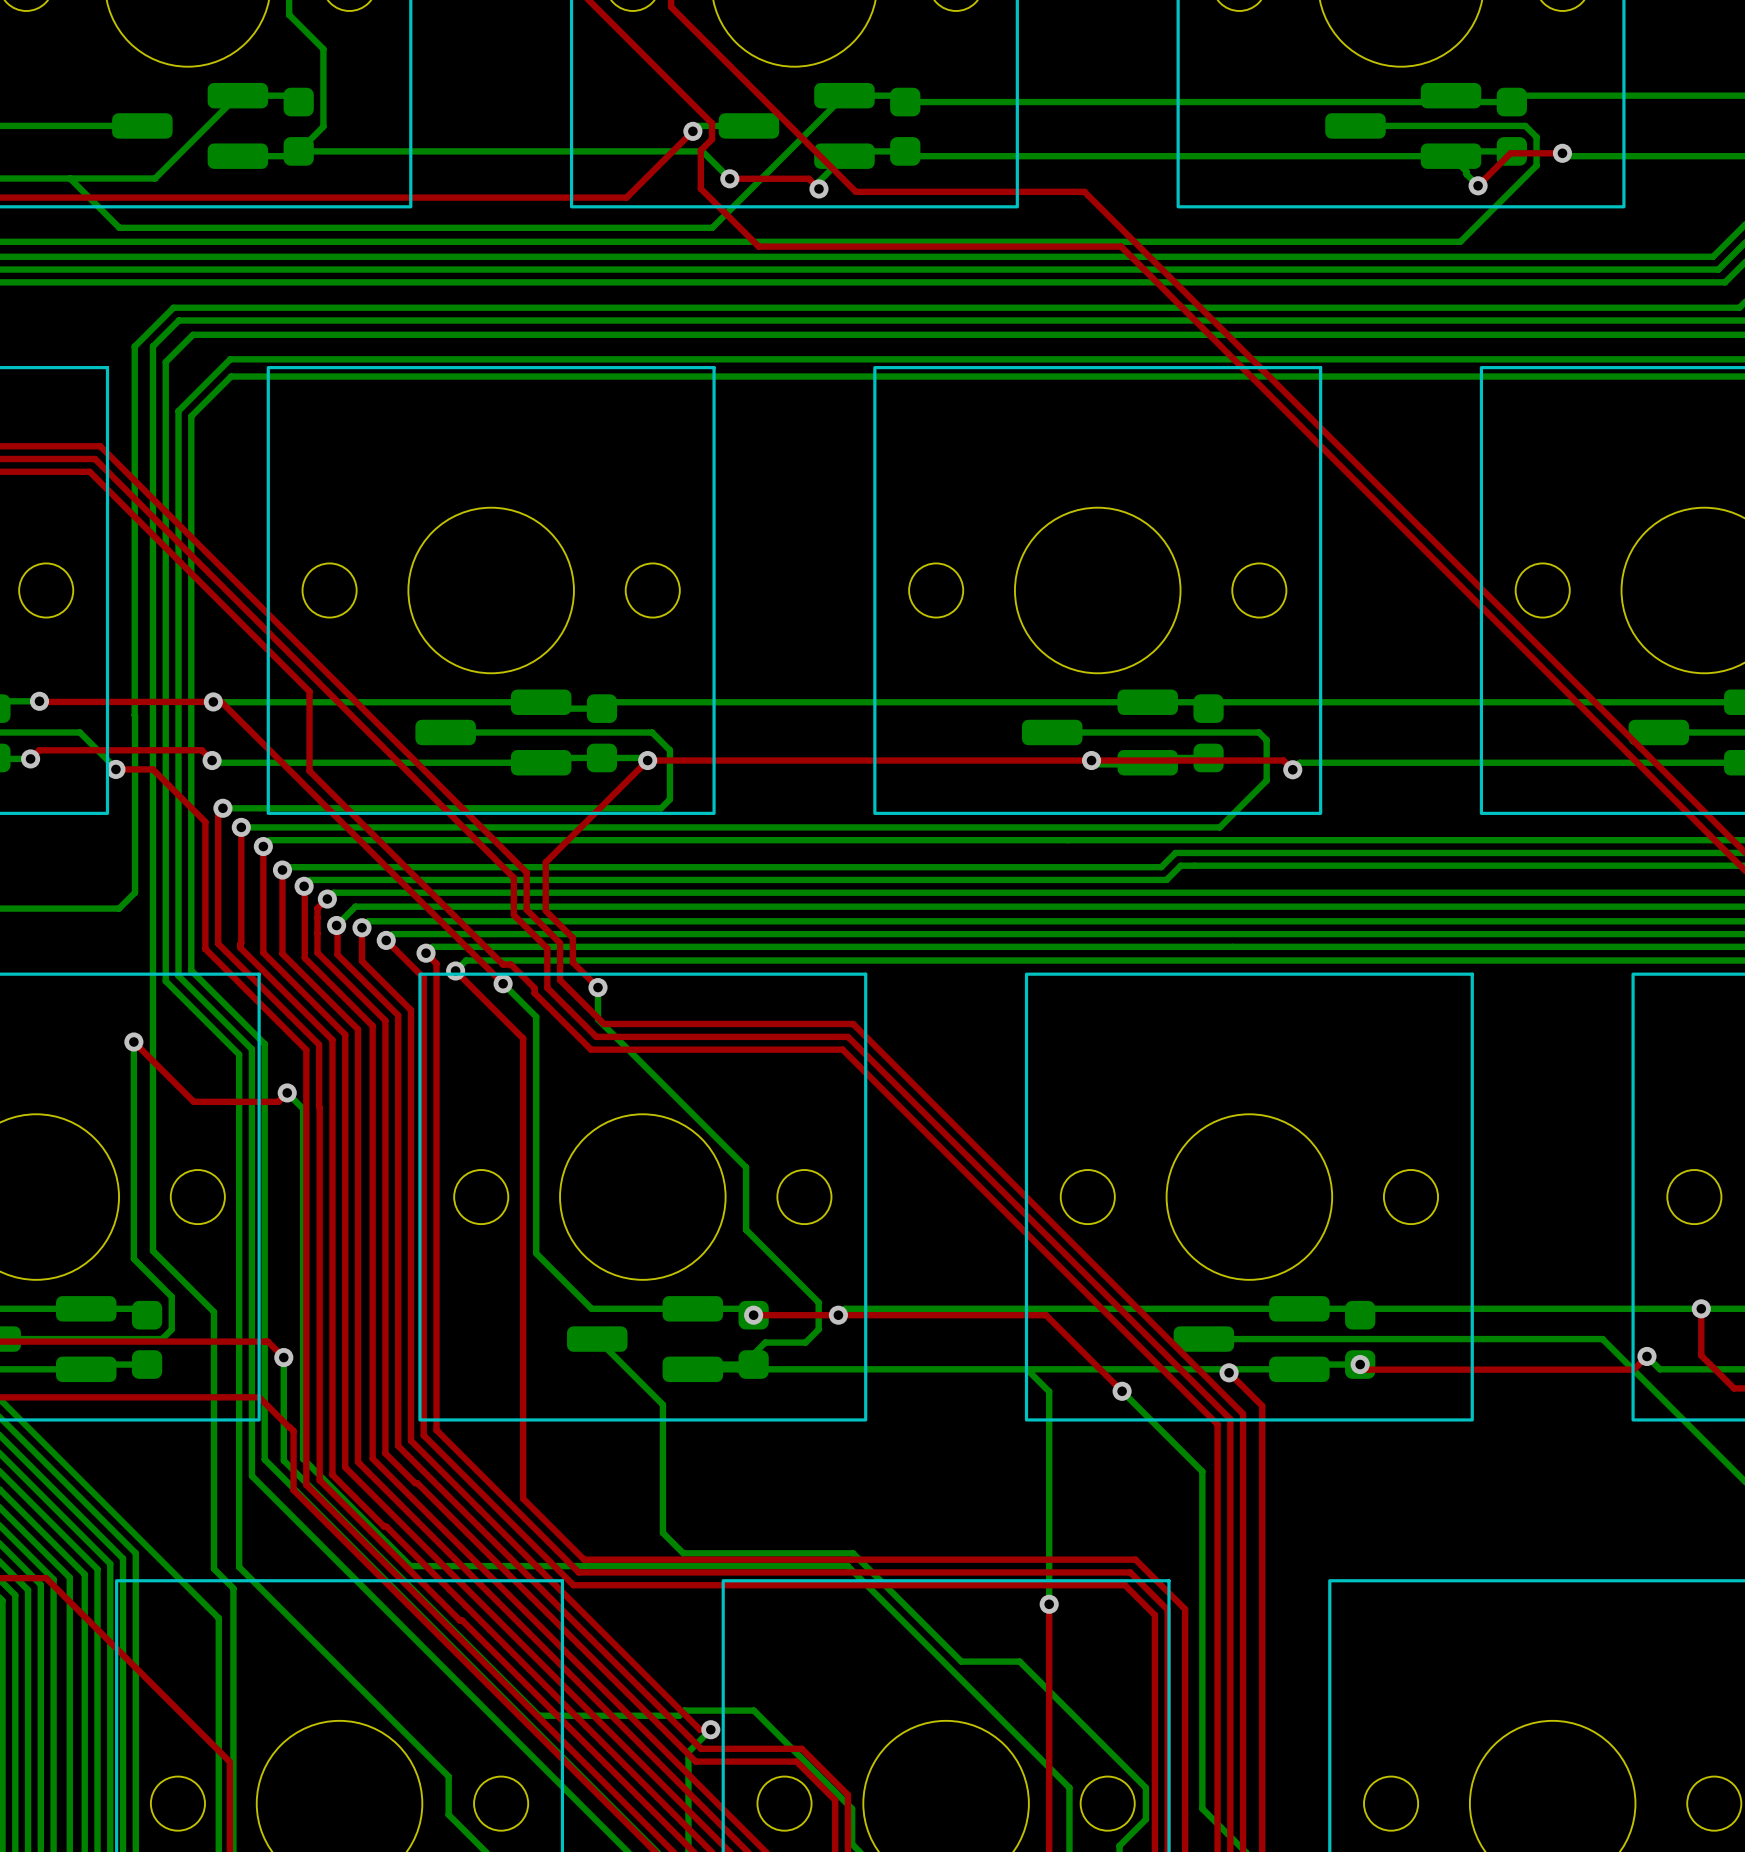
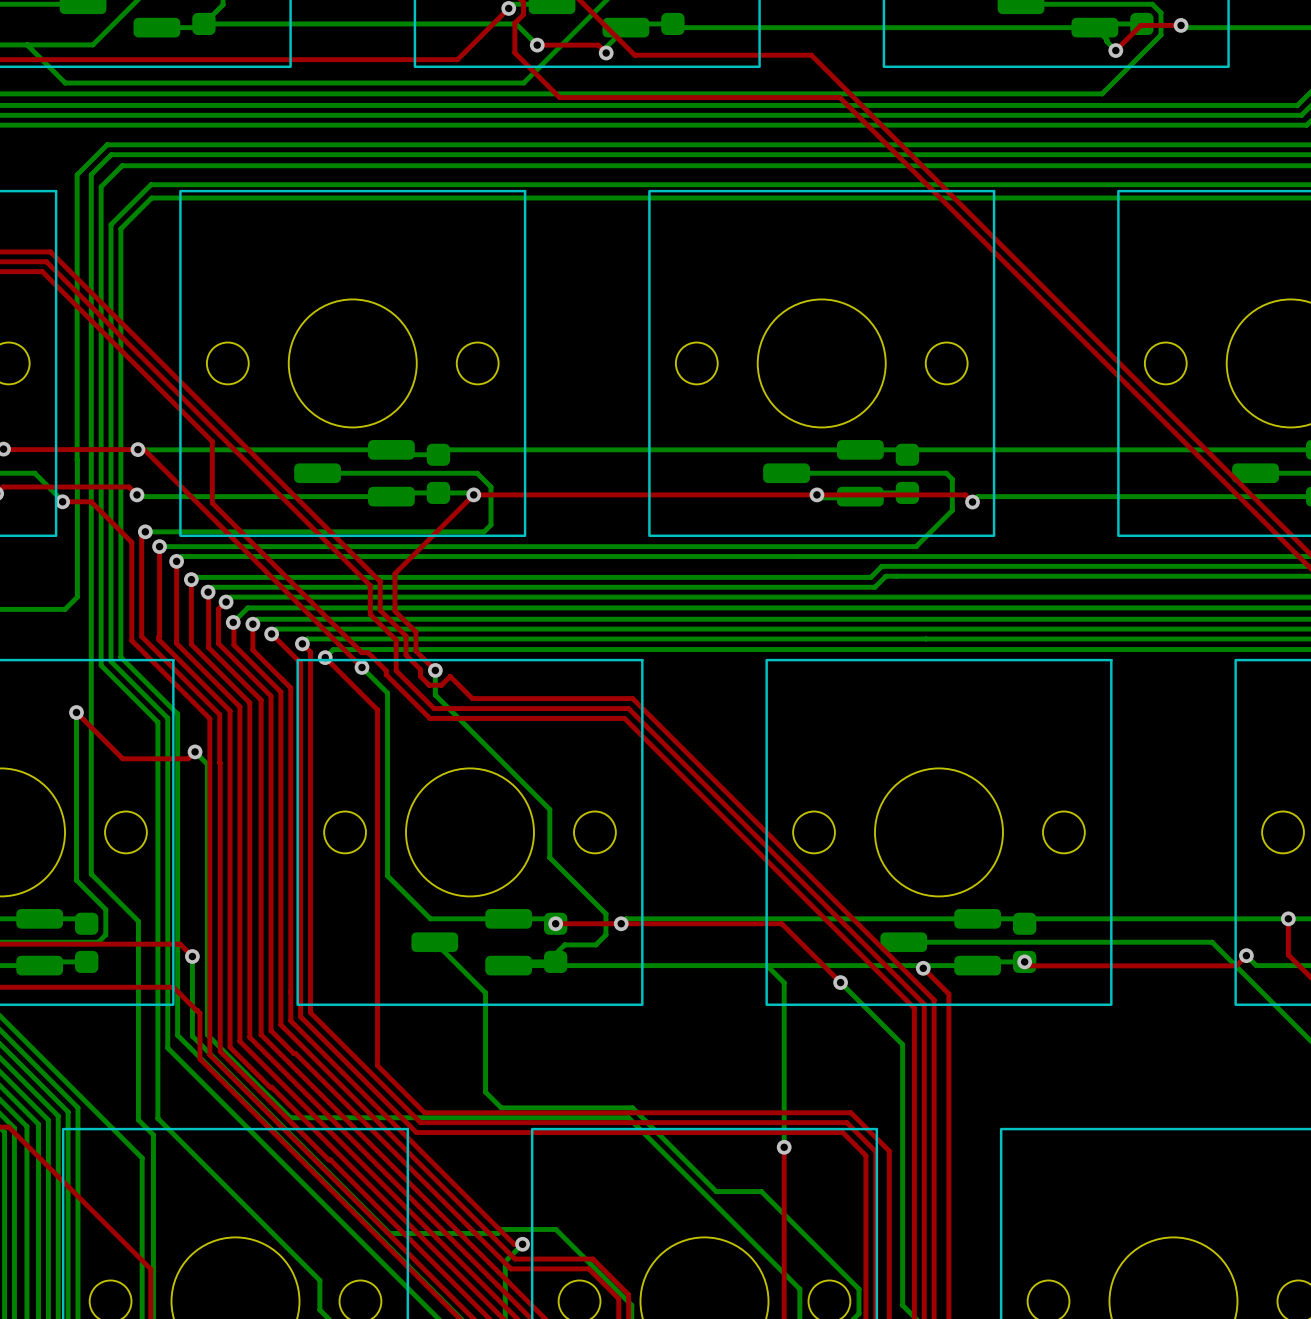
top track: (560, 967) (560, 980) (603, 1023) (645, 1023) -> (406, 655) (420, 669) (420, 676) (429, 685) (441, 685) (450, 676)
top track: none -> (450, 676) (472, 698)

